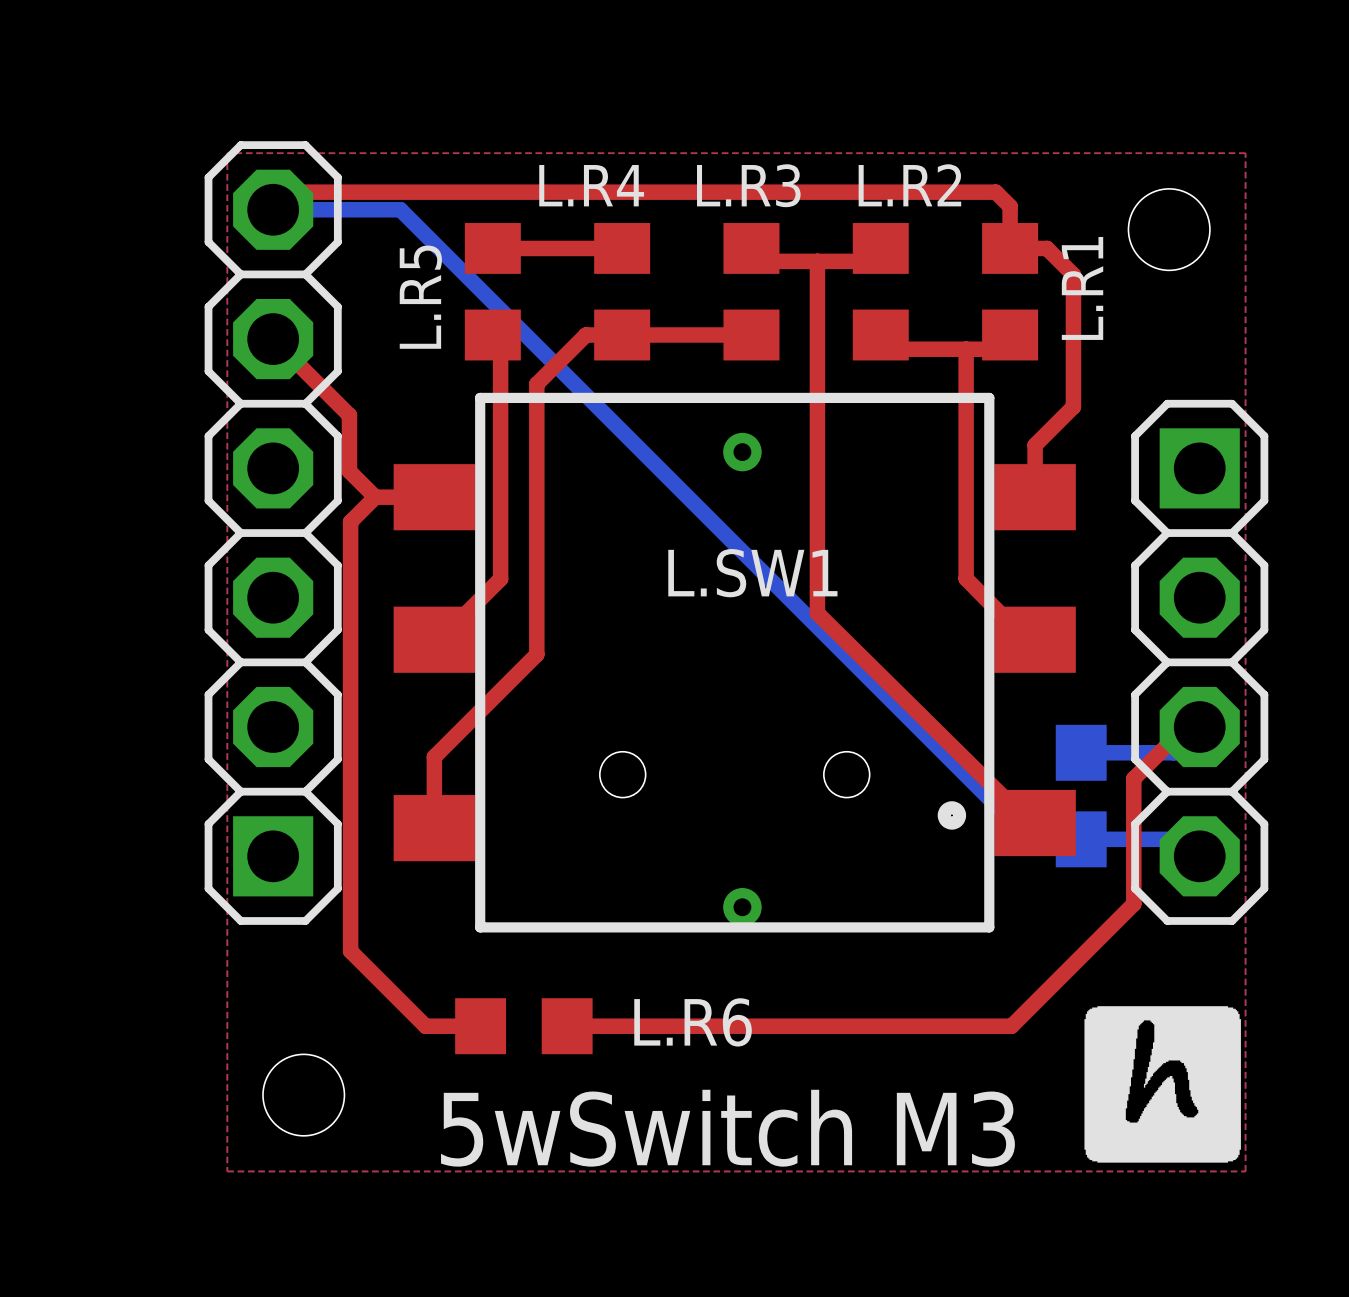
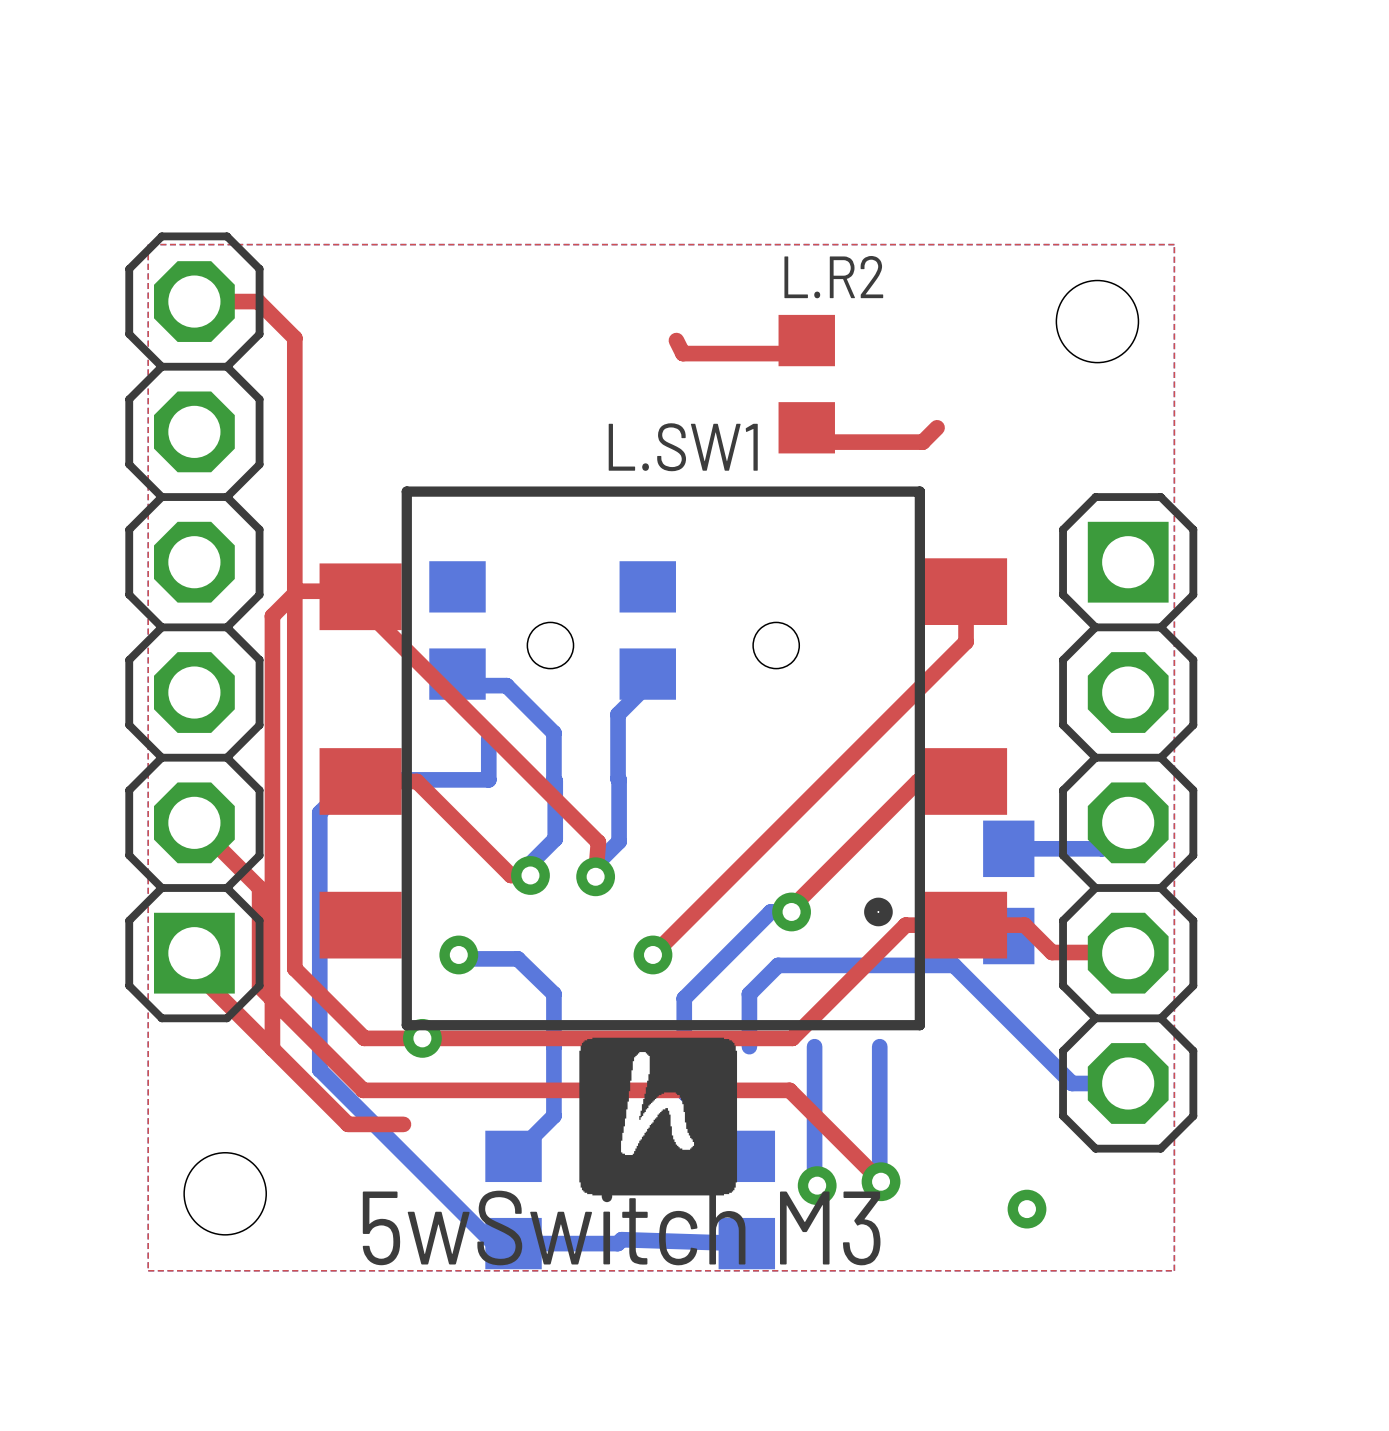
top track: (273, 209) (290, 192) (995, 192) (1010, 206) (1010, 248) (1047, 248) (1073, 274) (1073, 406) (1035, 445) (1035, 497) -> (194, 301) (258, 301) (294, 338) (294, 968) (364, 1038) (792, 1038) (905, 925) (1024, 925) (1052, 952) (1127, 952)
bottom track: (273, 209) (400, 209) (1030, 839) (1182, 839) (1199, 856) -> none
top track: (622, 247) (620, 245) (620, 248) (492, 248) -> none
top track: (817, 261) (817, 613) (1029, 823) (1035, 823) -> none
L.R5 side: top (492, 291) -> bottom (647, 630)
L.R4 side: top (622, 291) -> bottom (457, 630)
L.R3 side: top (751, 291) -> bottom (513, 1199)
L.R1 side: top (1010, 291) -> bottom (746, 1199)
top track: (492, 335) (500, 353) (500, 578) (439, 639) (434, 639) -> none
top track: (751, 335) (585, 335) (536, 384) (536, 654) (434, 756) (434, 828) -> none
top track: (273, 339) (349, 415) (349, 471) (375, 497) -> none
top track: (966, 349) (966, 578) (1026, 639) (1035, 639) -> none
via: (742, 452) -> none
top track: none -> (966, 591) (966, 641) (652, 954)
top track: none -> (360, 596) (360, 604) (598, 842) (595, 876)
L.SW1 name position: L.SW1 (752, 573) -> L.SW1 (683, 447)
bottom track: none -> (457, 674) (468, 674) (479, 685) (506, 685) (553, 732) (555, 838) (530, 863) (530, 875)
bottom track: none -> (647, 674) (647, 684) (618, 714) (619, 841) (595, 865) (595, 876)
bottom track: none -> (488, 738) (488, 779) (389, 779) (371, 797) (334, 797) (319, 812) (319, 1069) (493, 1243) (617, 1243) (621, 1239) (746, 1243)
L.SW1 rotation: 0° (734, 662) -> 180° (663, 758)
part: (1199, 662) -> none
top track: none -> (360, 781) (416, 781) (510, 875) (530, 875)
top track: none -> (966, 781) (917, 781) (791, 907) (791, 911)
top track: none -> (194, 822) (259, 888) (259, 986) (363, 1090) (789, 1090) (881, 1181)
top track: (1199, 727) (1185, 727) (1133, 778) (1133, 904) (1011, 1026) (567, 1026) -> none
part: none -> (1128, 822)
via: none -> (530, 875)
via: none -> (595, 876)
bottom track: none -> (791, 911) (770, 911) (684, 998) (684, 1092) (746, 1156)
via: none -> (791, 911)
bottom track: none -> (458, 954) (462, 958) (517, 958) (553, 993) (553, 1115) (513, 1156)
via: none -> (458, 954)
via position: (742, 907) -> (652, 954)
via: none -> (422, 1038)
drawing: none -> [579, 1037, 738, 1196]
bottom track: none -> (749, 1046) (749, 994) (778, 965) (954, 965) (1072, 1083) (1128, 1083)
bottom track: none -> (814, 1046) (814, 1183) (817, 1185)
bottom track: none -> (879, 1046) (881, 1181)
drawing: [1084, 1006, 1241, 1163] -> none
L.R6: (523, 1026) -> none
via: none -> (881, 1181)
via: none -> (817, 1185)
via: none -> (1027, 1209)

